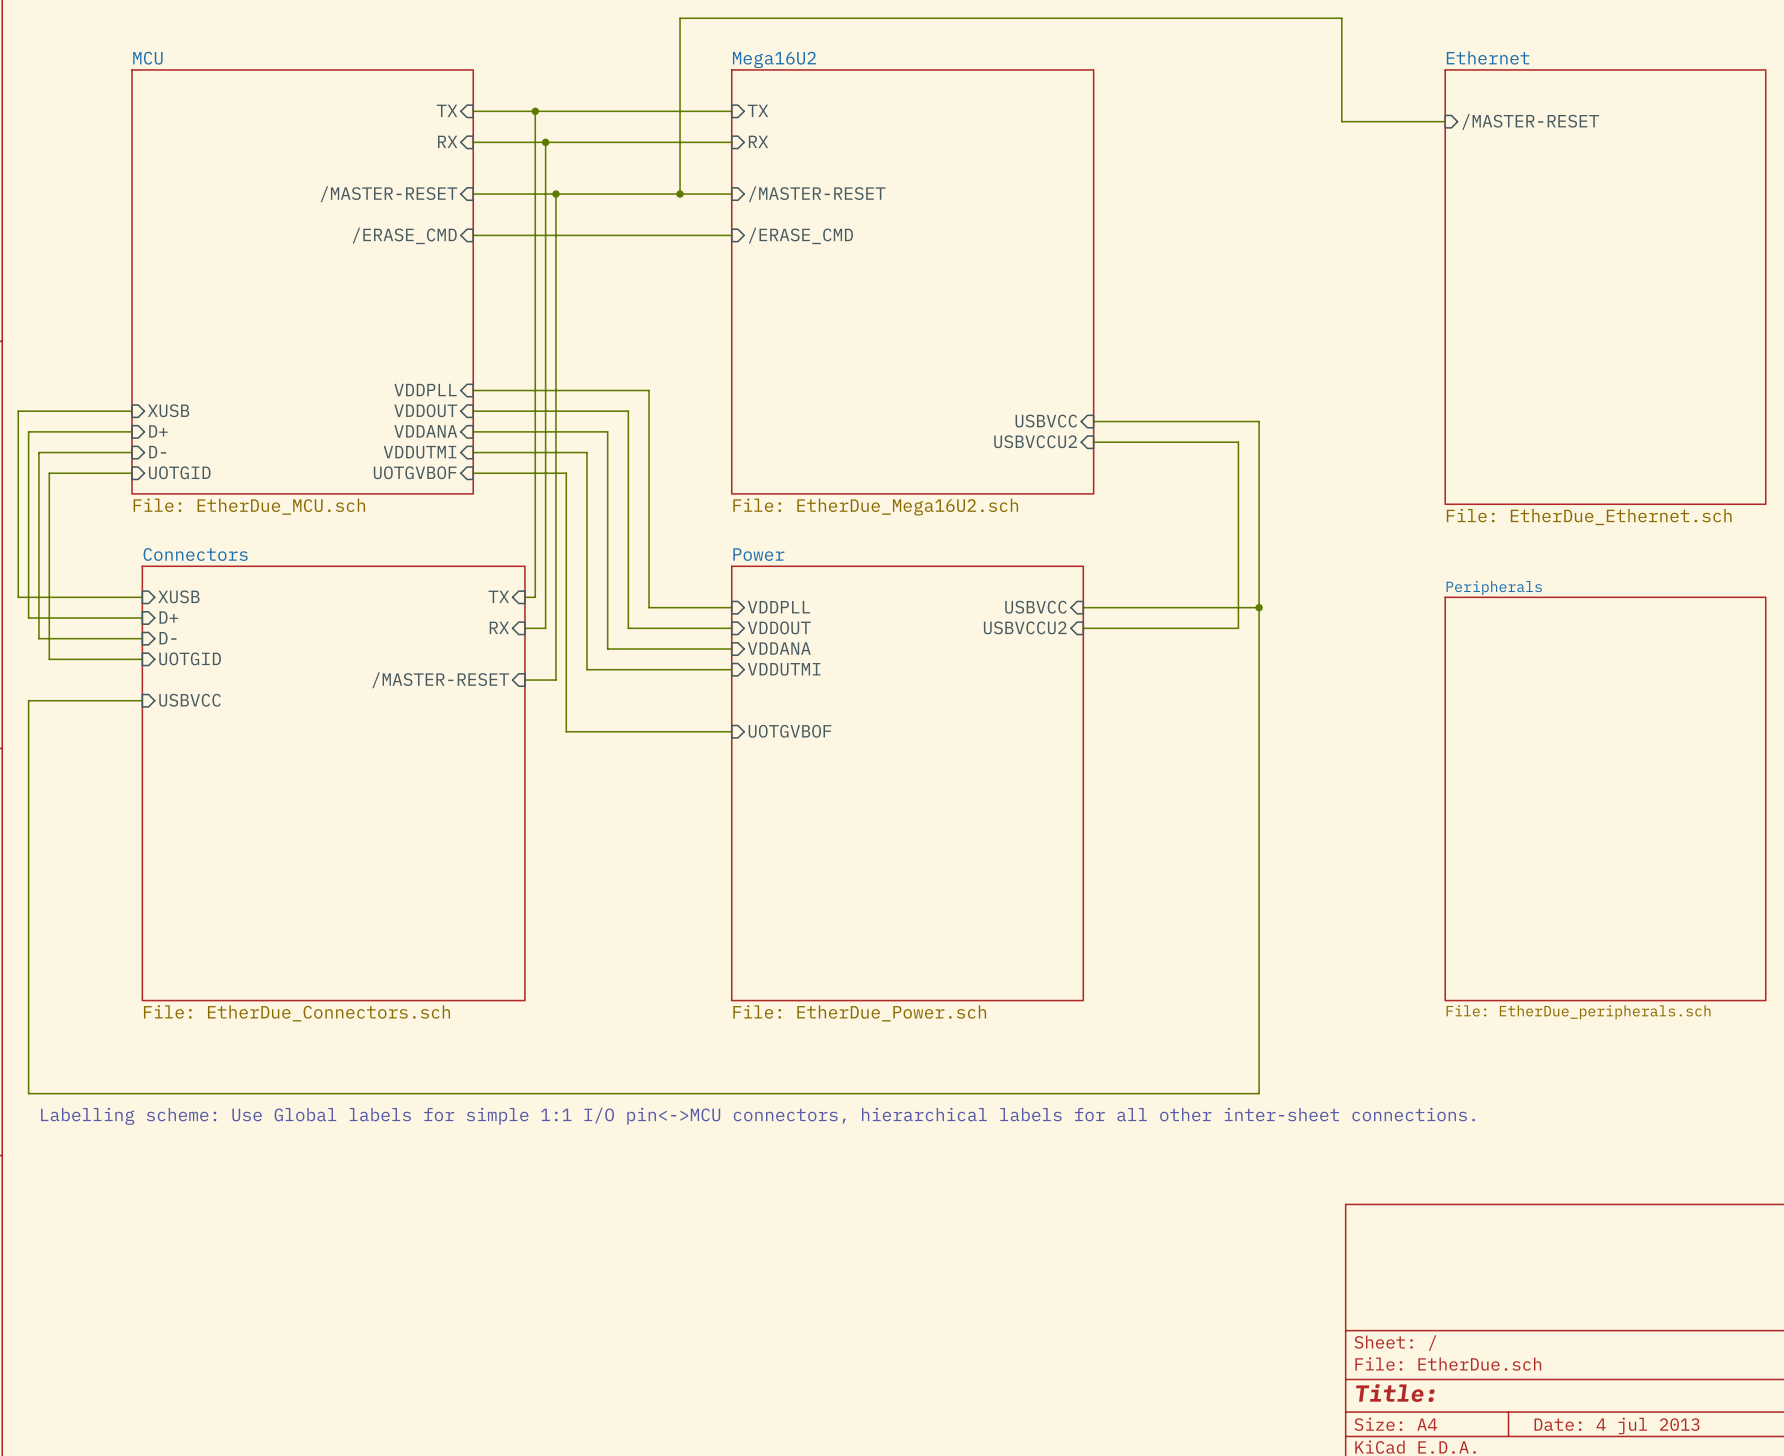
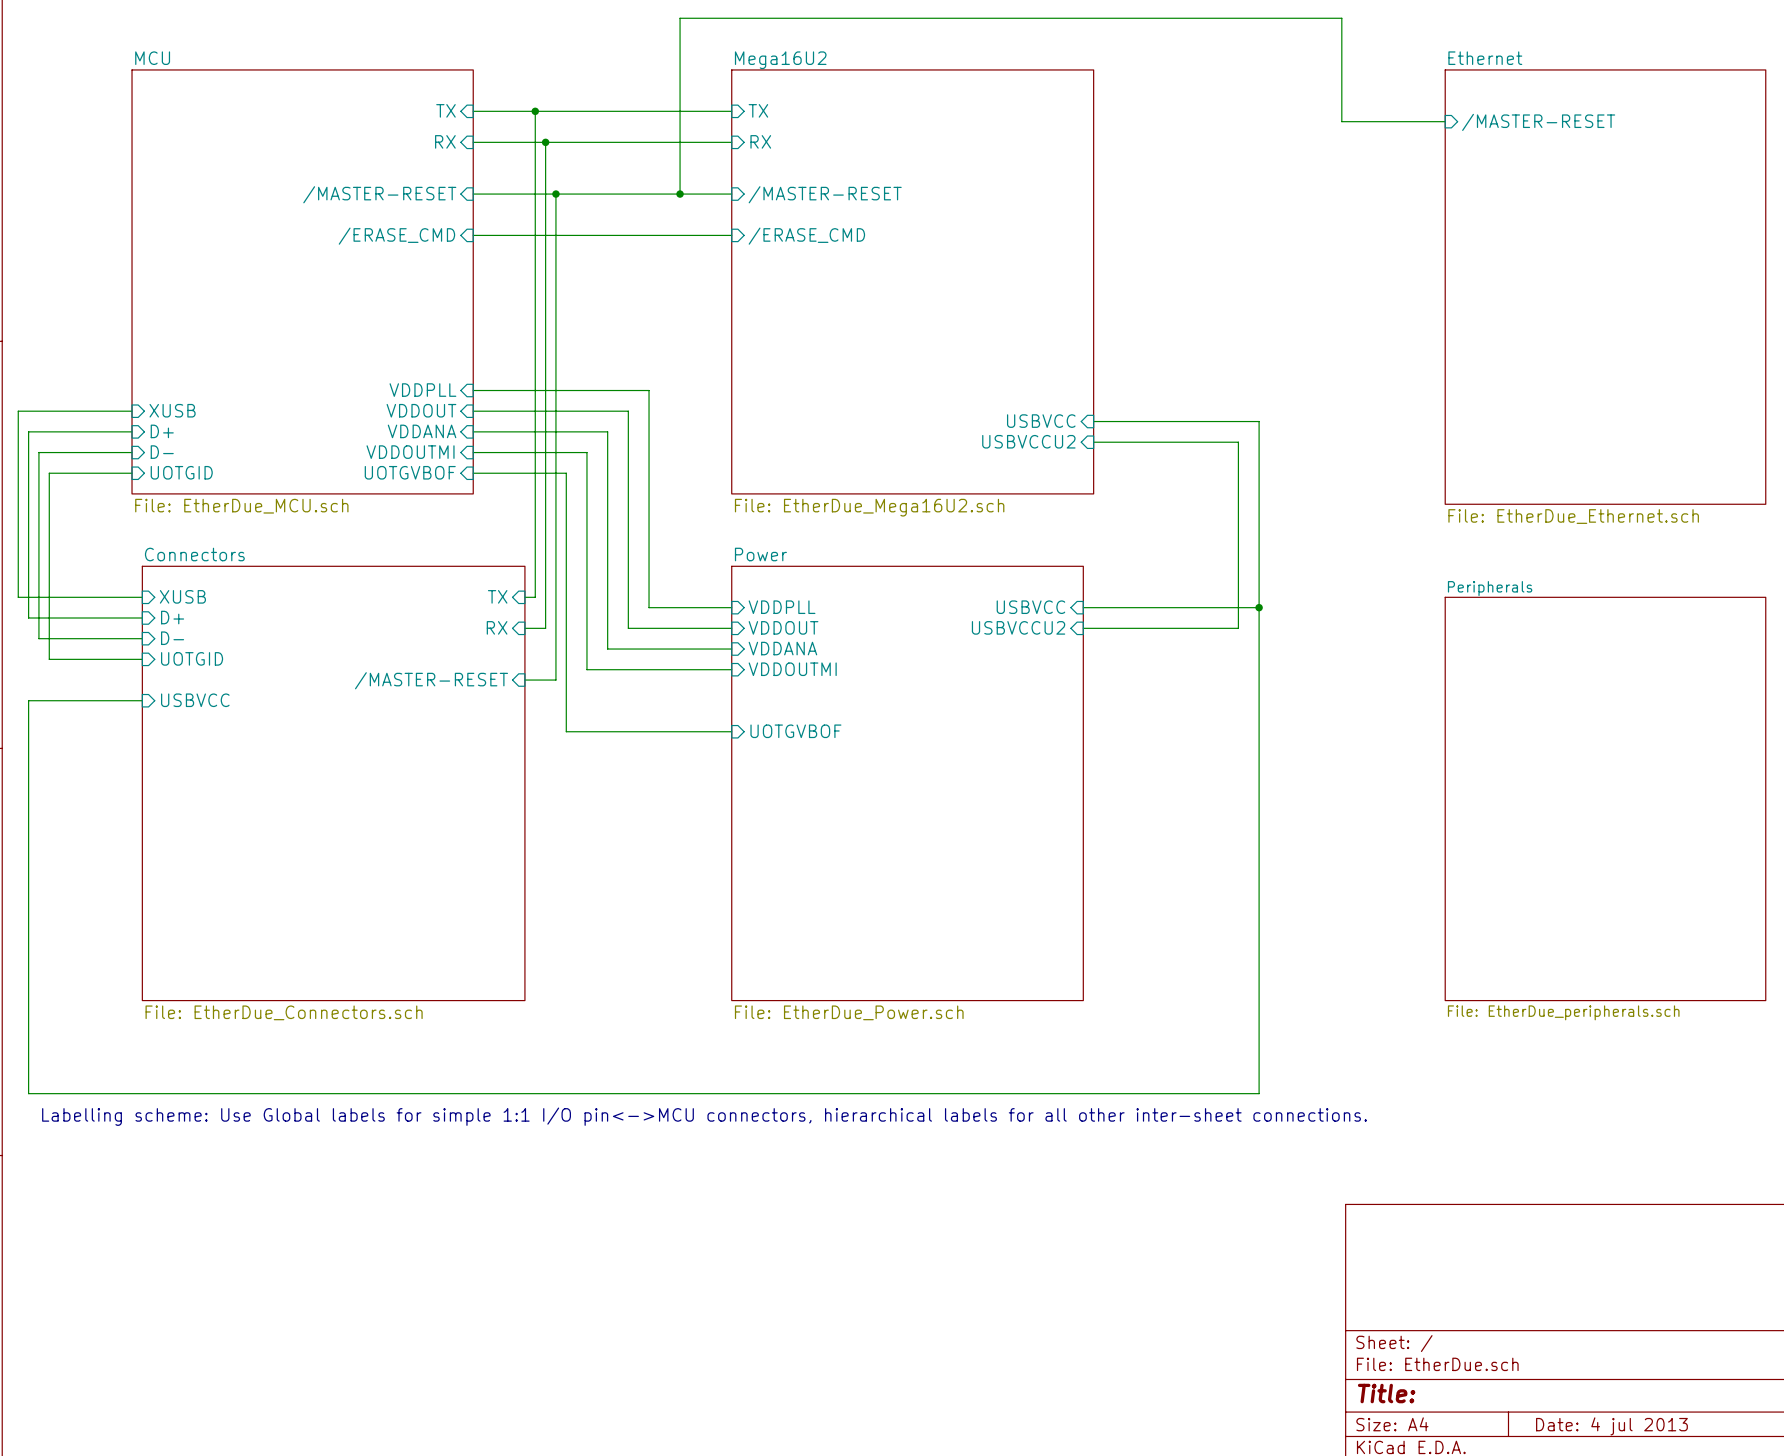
sheet pin: VDDUTMI (419, 452) -> VDDOUTMI (410, 452)
sheet pin: VDDUTMI (784, 669) -> VDDOUTMI (792, 669)

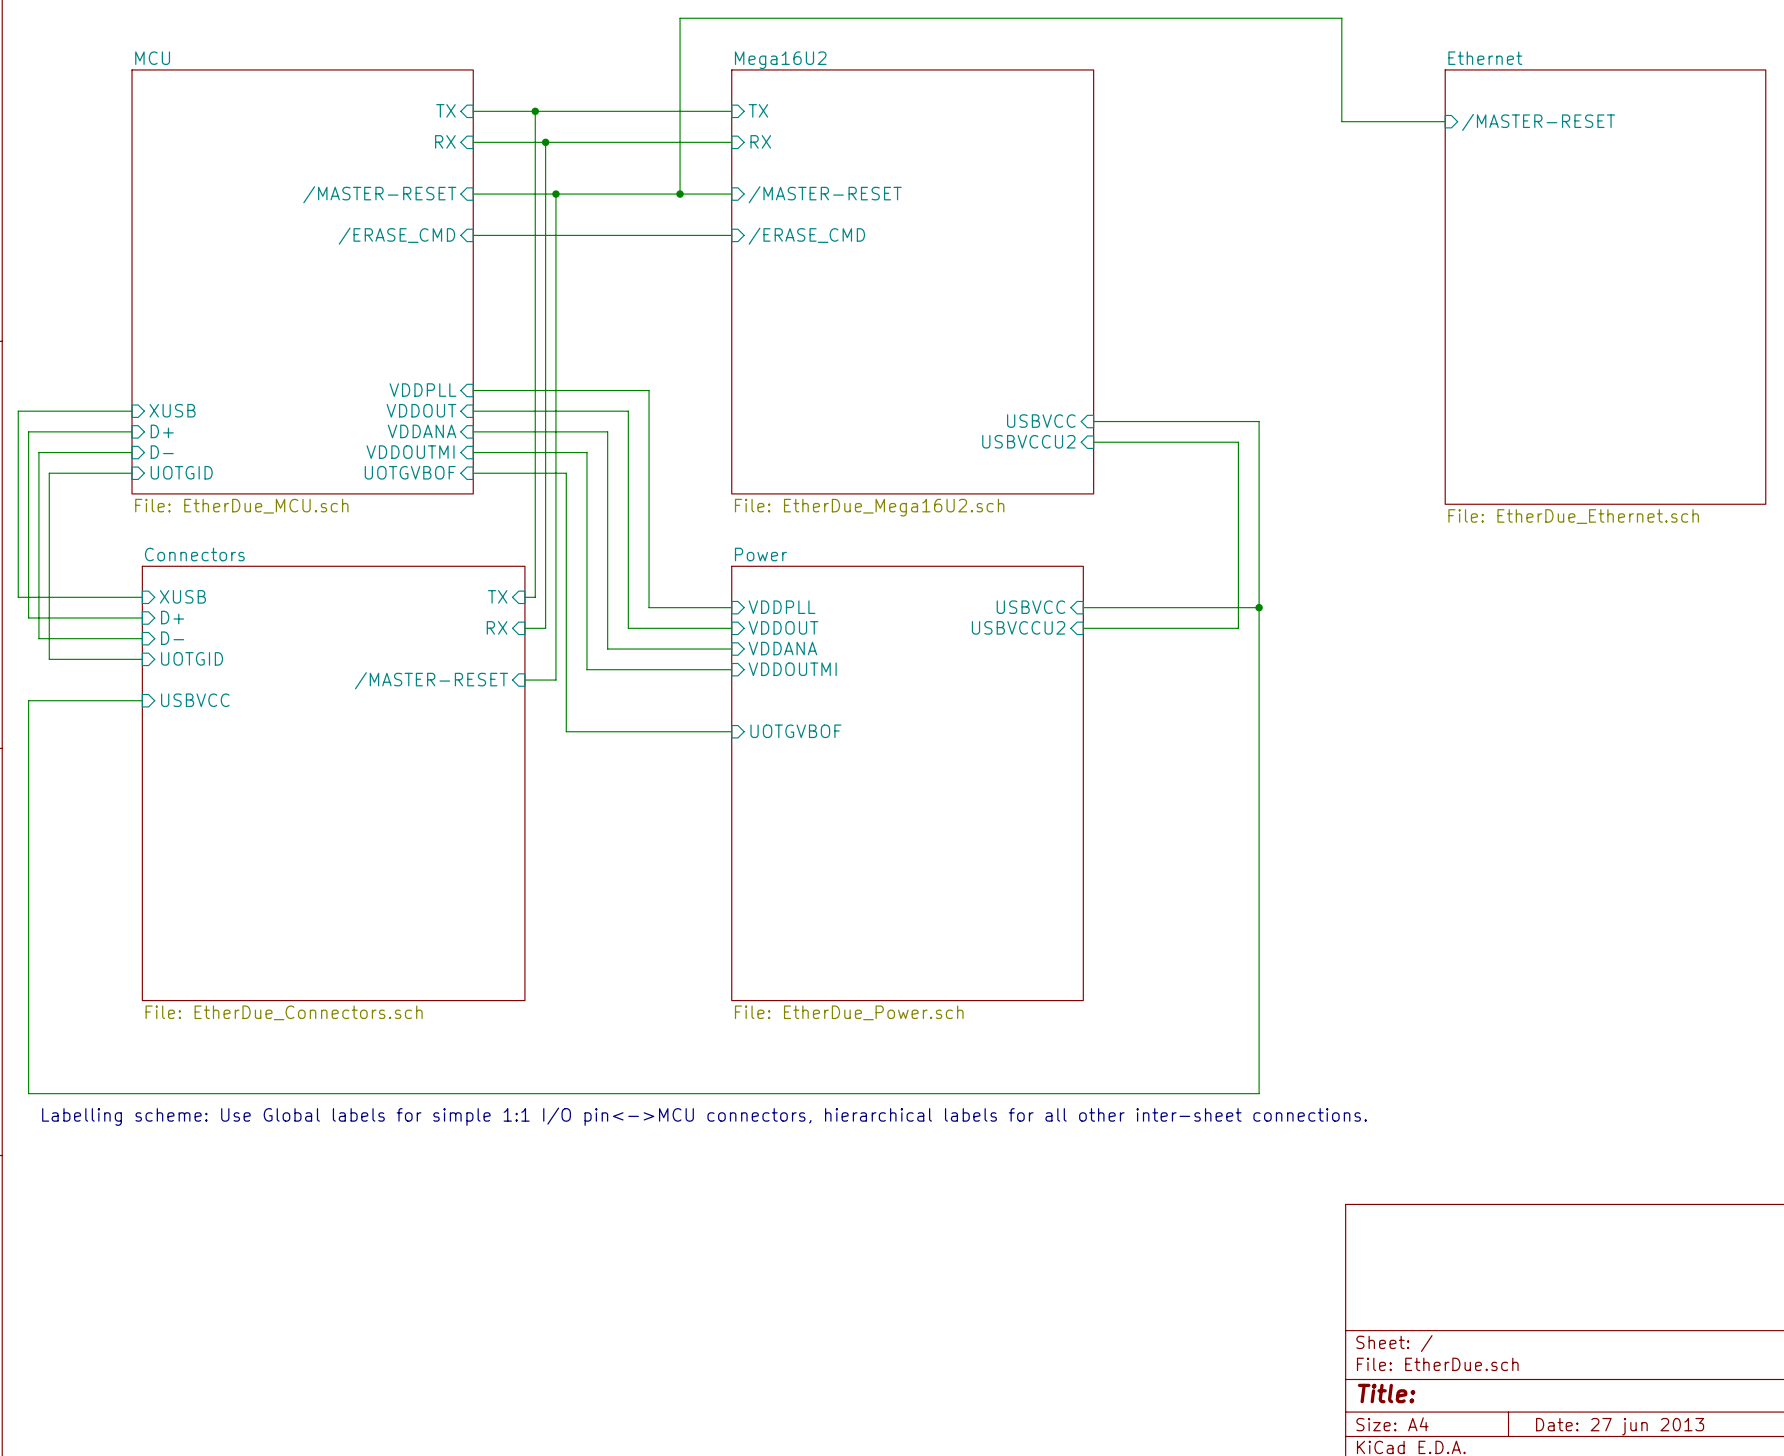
sheet Peripherals: File: EtherDue_peripherals.sch (1605, 798) -> none
title block: Date: 4 jul 2013 (1611, 1426) -> Date: 27 jun 2013 (1620, 1426)

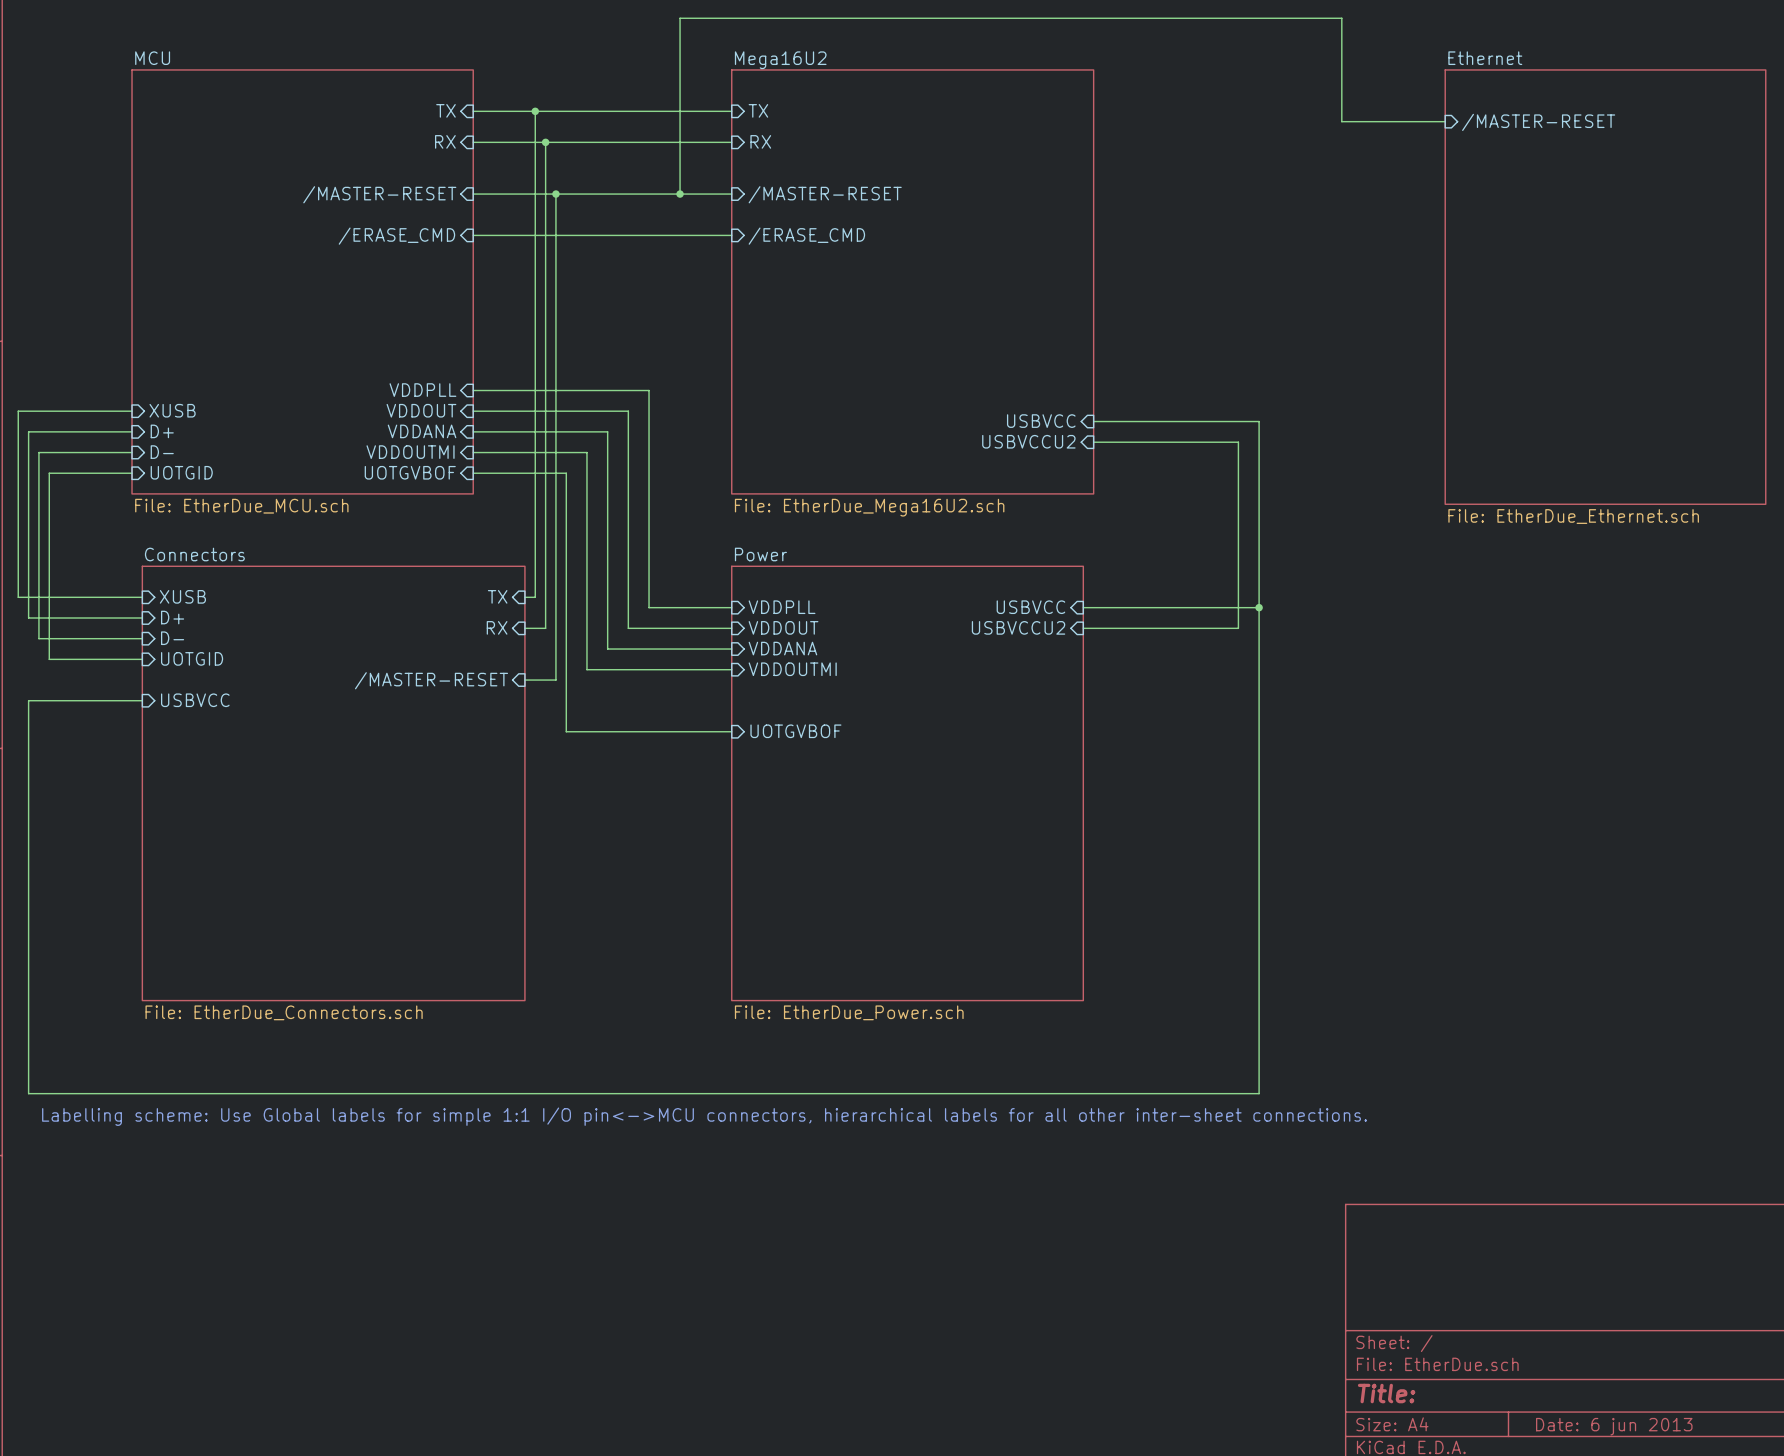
title block: Date: 27 jun 2013 (1620, 1426) -> Date: 6 jun 2013 (1614, 1426)

